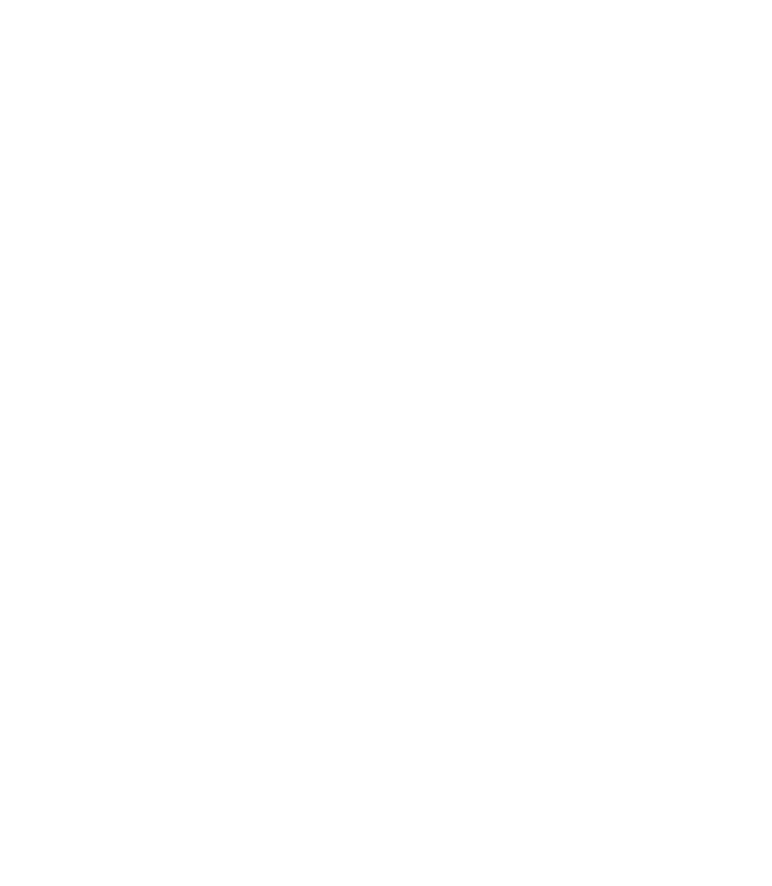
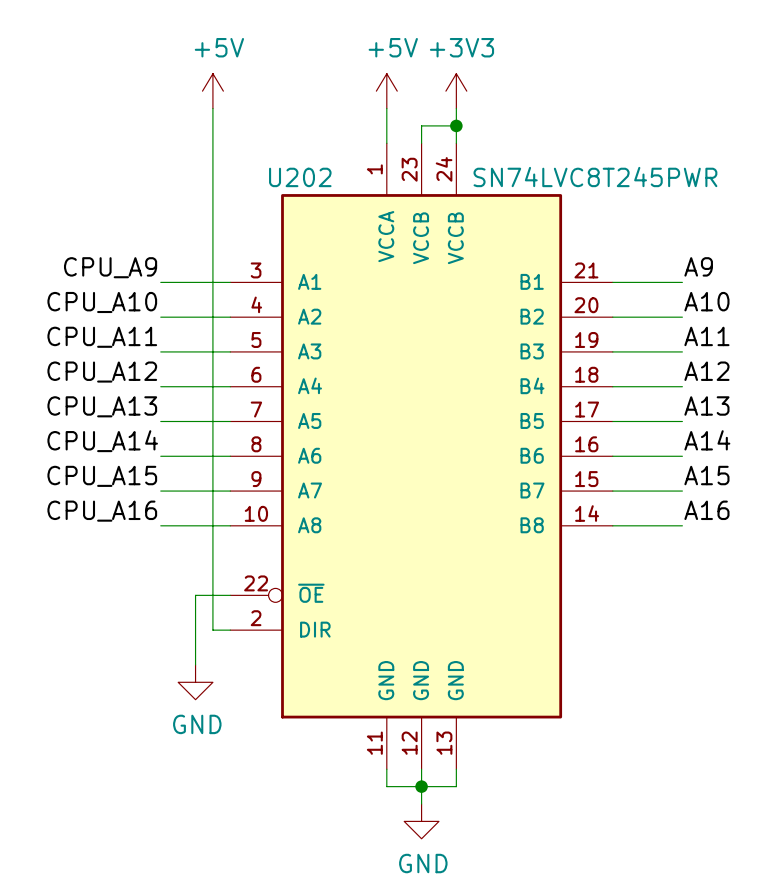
power symbol: none -> +5V (212, 91)
power symbol: none -> +5V (386, 91)
power symbol: none -> +3V3 (456, 91)
wire: none -> (212, 108) (212, 630) (230, 630)
wire: none -> (386, 108) (386, 143)
wire: none -> (456, 108) (456, 143)
wire: none -> (456, 125) (421, 125) (421, 143)
junction: none -> (456, 125)
label: none -> A9 (698, 266)
label: none -> CPU_A9 (110, 267)
wire: none -> (160, 282) (230, 282)
wire: none -> (612, 282) (682, 282)
label: none -> A10 (706, 301)
label: none -> CPU_A10 (102, 302)
wire: none -> (160, 317) (230, 317)
wire: none -> (612, 317) (682, 317)
label: none -> A11 (706, 336)
label: none -> CPU_A11 (102, 337)
wire: none -> (160, 351) (230, 351)
wire: none -> (612, 351) (682, 351)
label: none -> A12 (706, 371)
label: none -> CPU_A12 (102, 372)
wire: none -> (160, 386) (230, 386)
wire: none -> (612, 386) (682, 386)
label: none -> A13 (706, 405)
label: none -> CPU_A13 (102, 406)
wire: none -> (160, 421) (230, 421)
wire: none -> (612, 421) (682, 421)
label: none -> A14 (707, 440)
label: none -> CPU_A14 (102, 441)
wire: none -> (160, 456) (230, 456)
U202: none -> SN74LVC8T245PWR (421, 456)
wire: none -> (612, 456) (682, 456)
label: none -> A15 (706, 475)
label: none -> CPU_A15 (102, 476)
wire: none -> (160, 491) (230, 491)
wire: none -> (612, 491) (682, 491)
label: none -> A16 (706, 510)
label: none -> CPU_A16 (102, 511)
wire: none -> (160, 525) (230, 525)
wire: none -> (612, 525) (682, 525)
wire: none -> (230, 595) (195, 595) (195, 664)
power symbol: none -> GND (195, 682)
wire: none -> (386, 769) (386, 786) (456, 786) (456, 769)
wire: none -> (421, 769) (421, 804)
junction: none -> (421, 786)
power symbol: none -> GND (421, 821)

